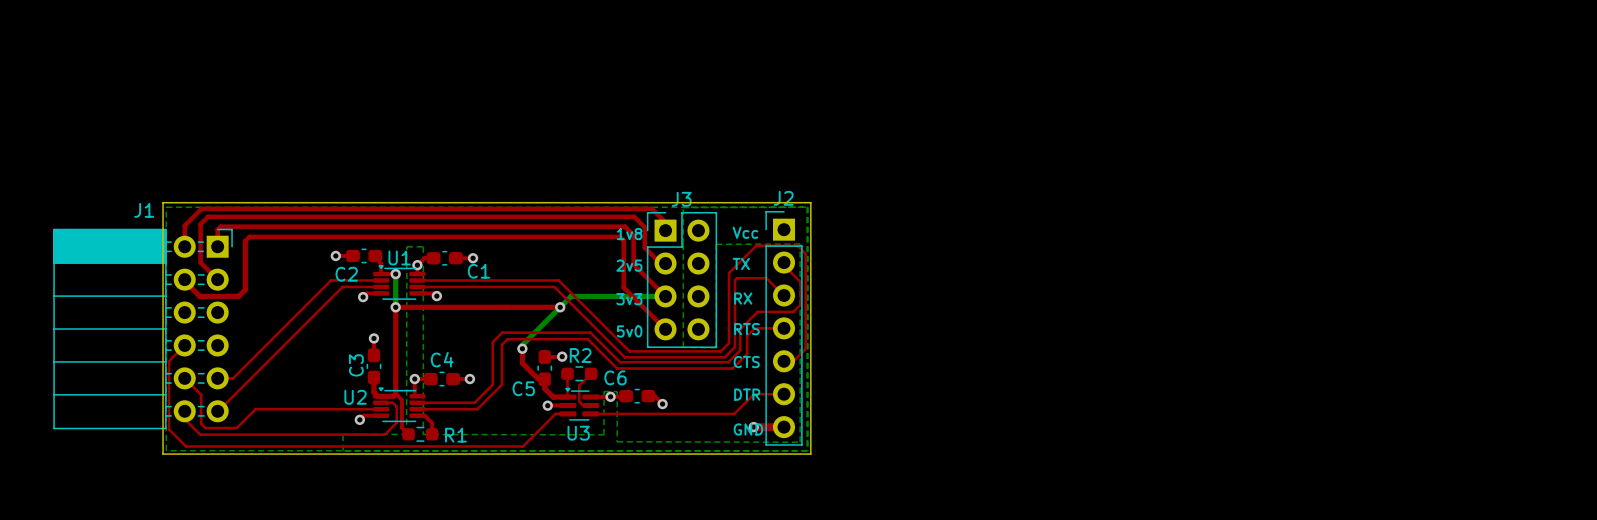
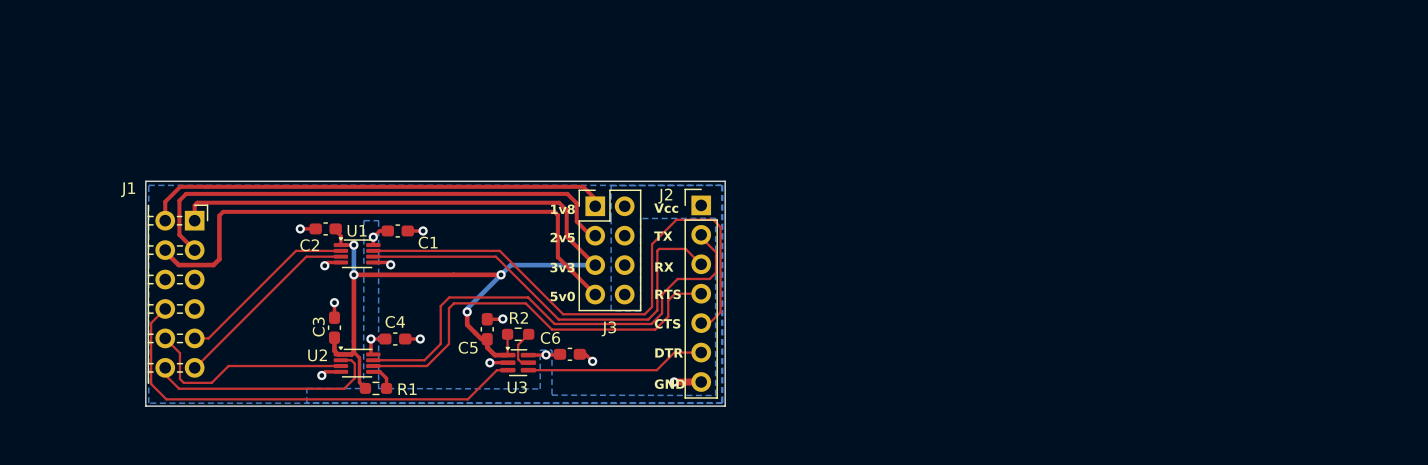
J2 name position: J2 (783, 198) -> J2 (665, 196)
J3 name position: J3 (681, 199) -> J3 (608, 328)
J1 footprint: [53, 228, 233, 430] -> [147, 204, 209, 384]

